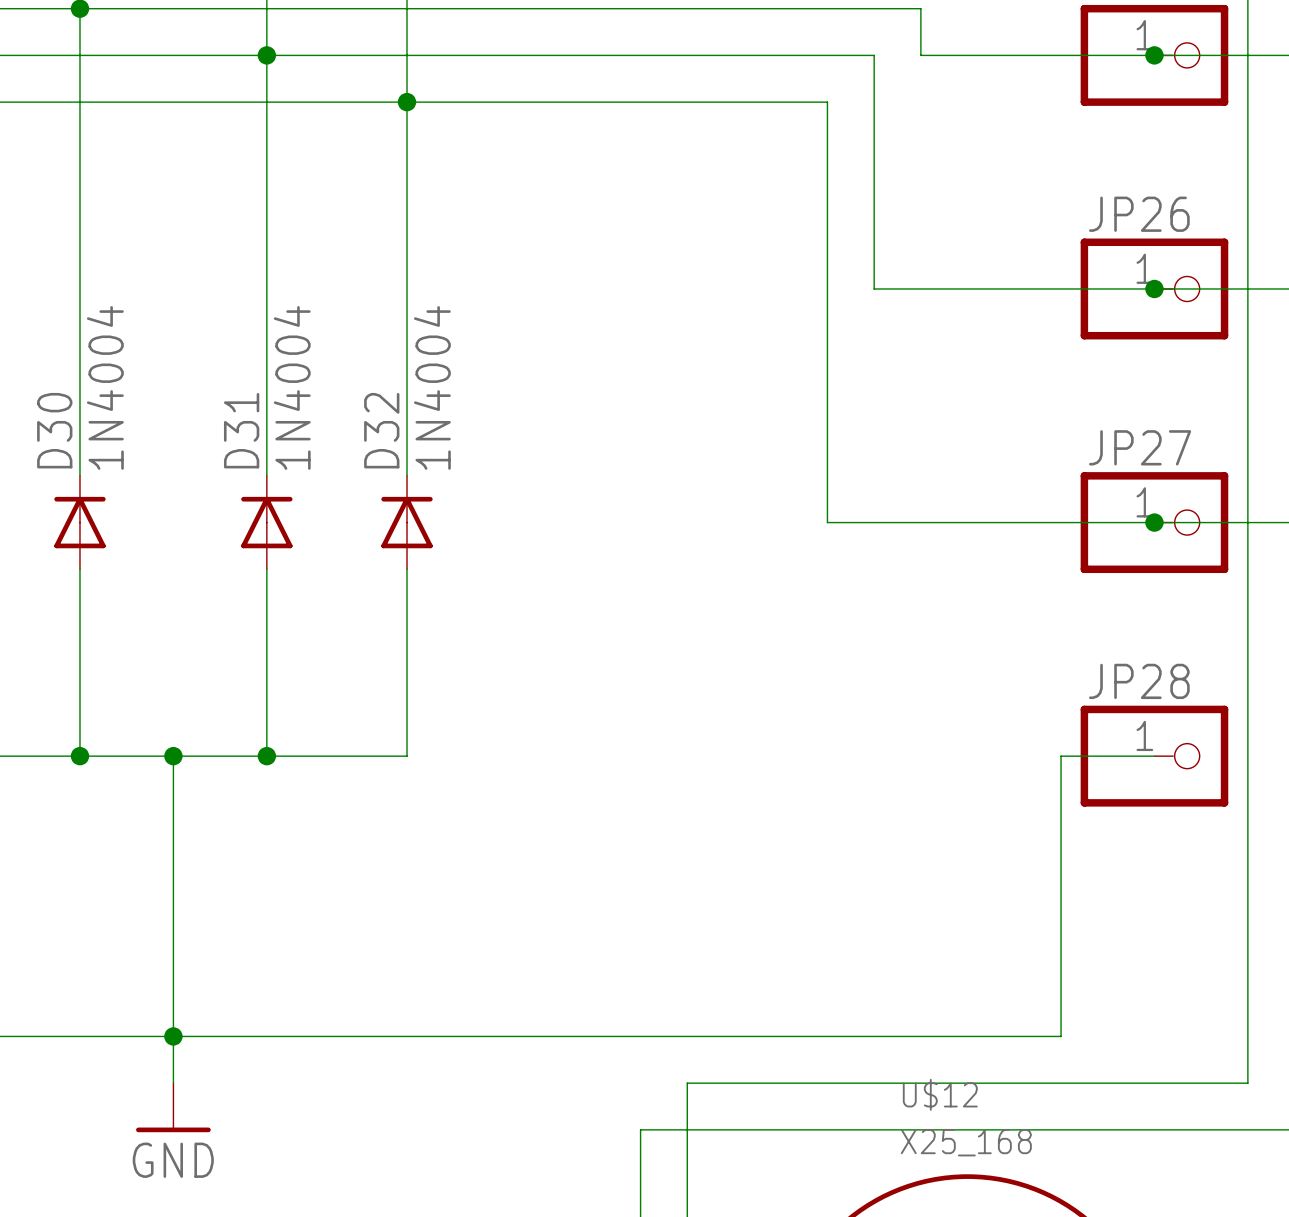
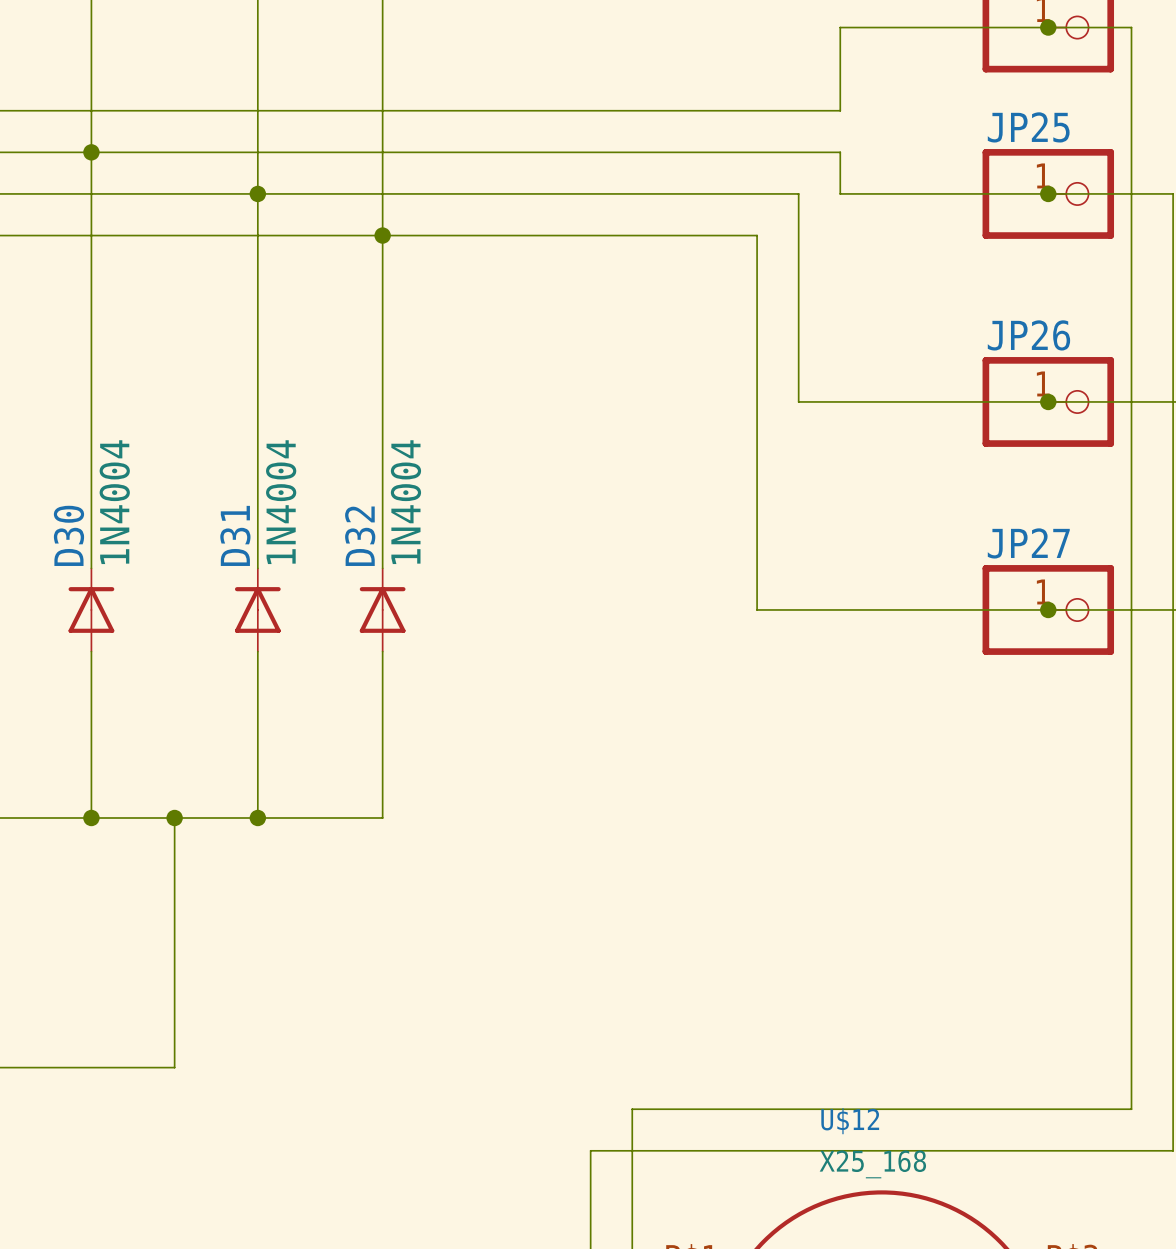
wire: (1154, 756) (1061, 756) (1061, 1036) (173, 1036) (173, 1083) -> none
JP28: (1154, 756) -> none
junction: (173, 1036) -> none
power symbol: GND (173, 1107) -> none

